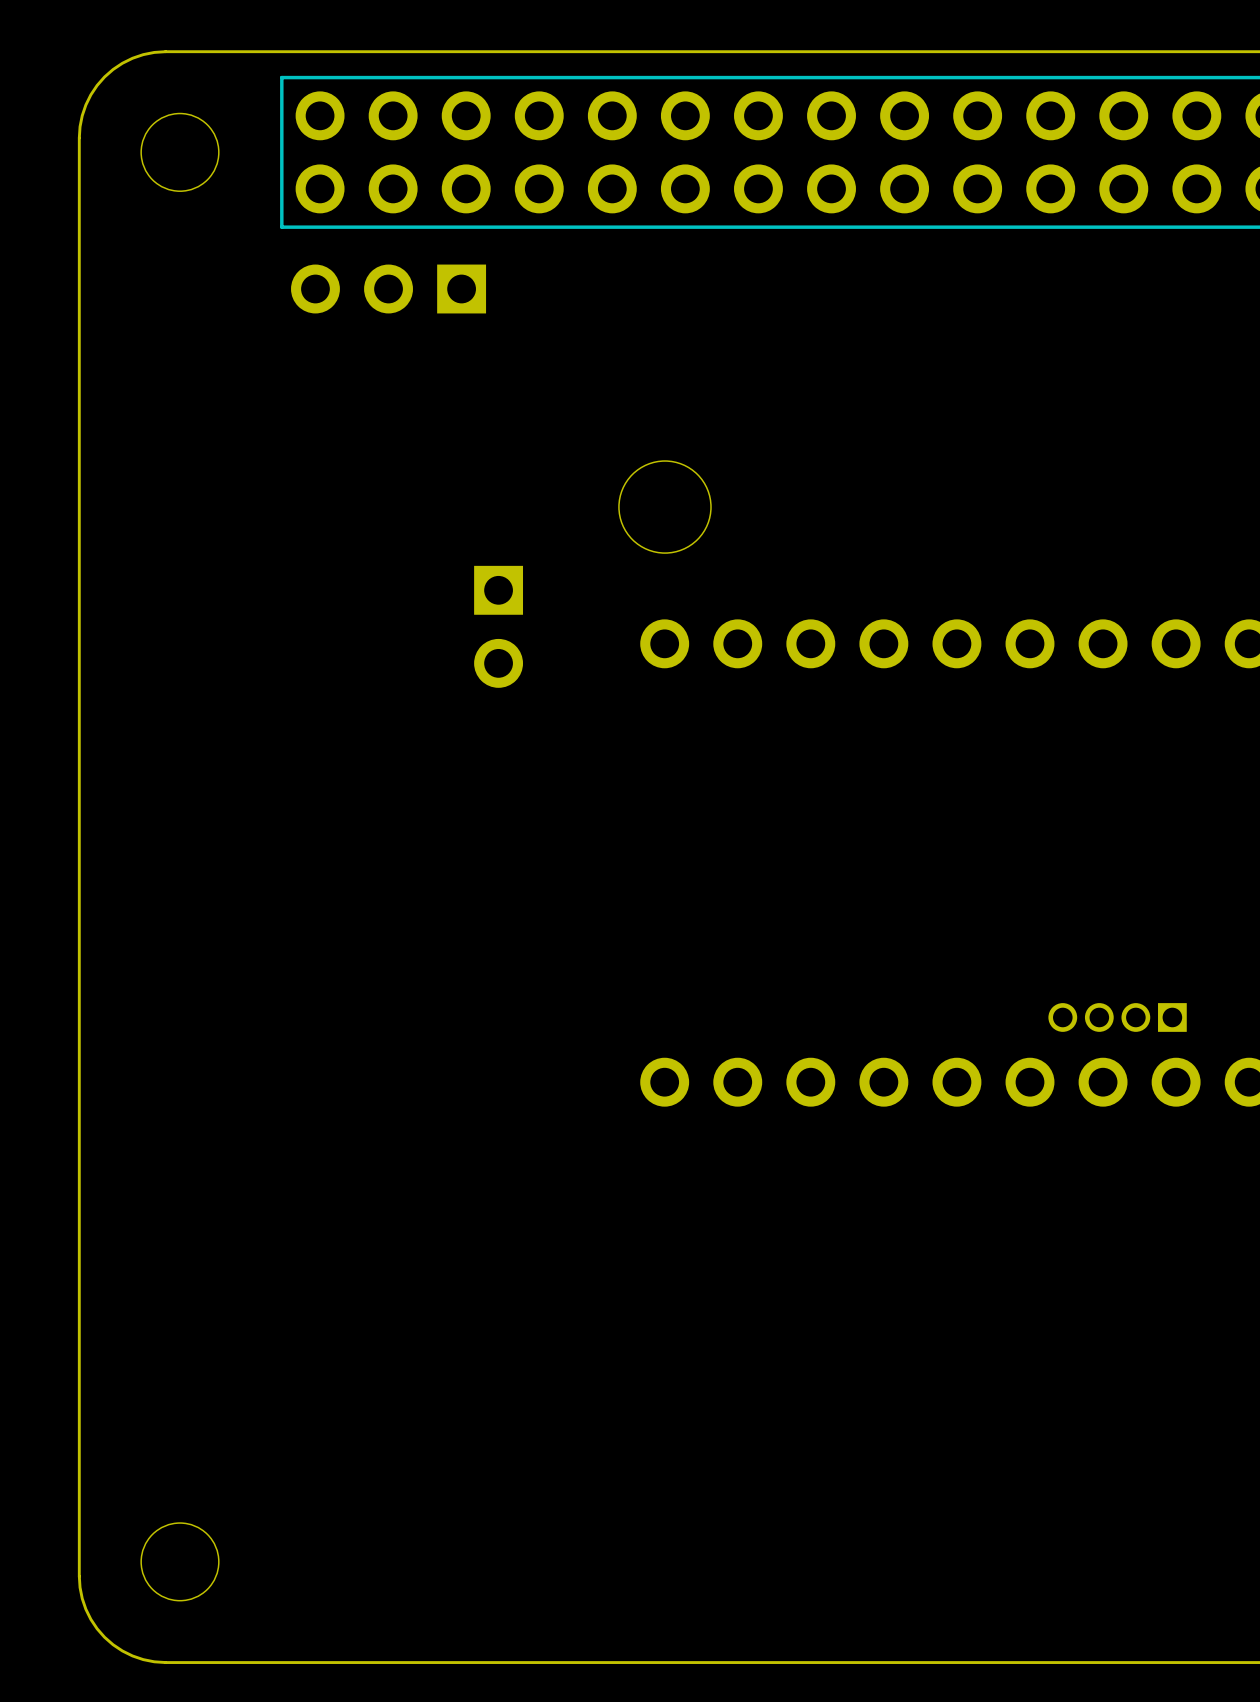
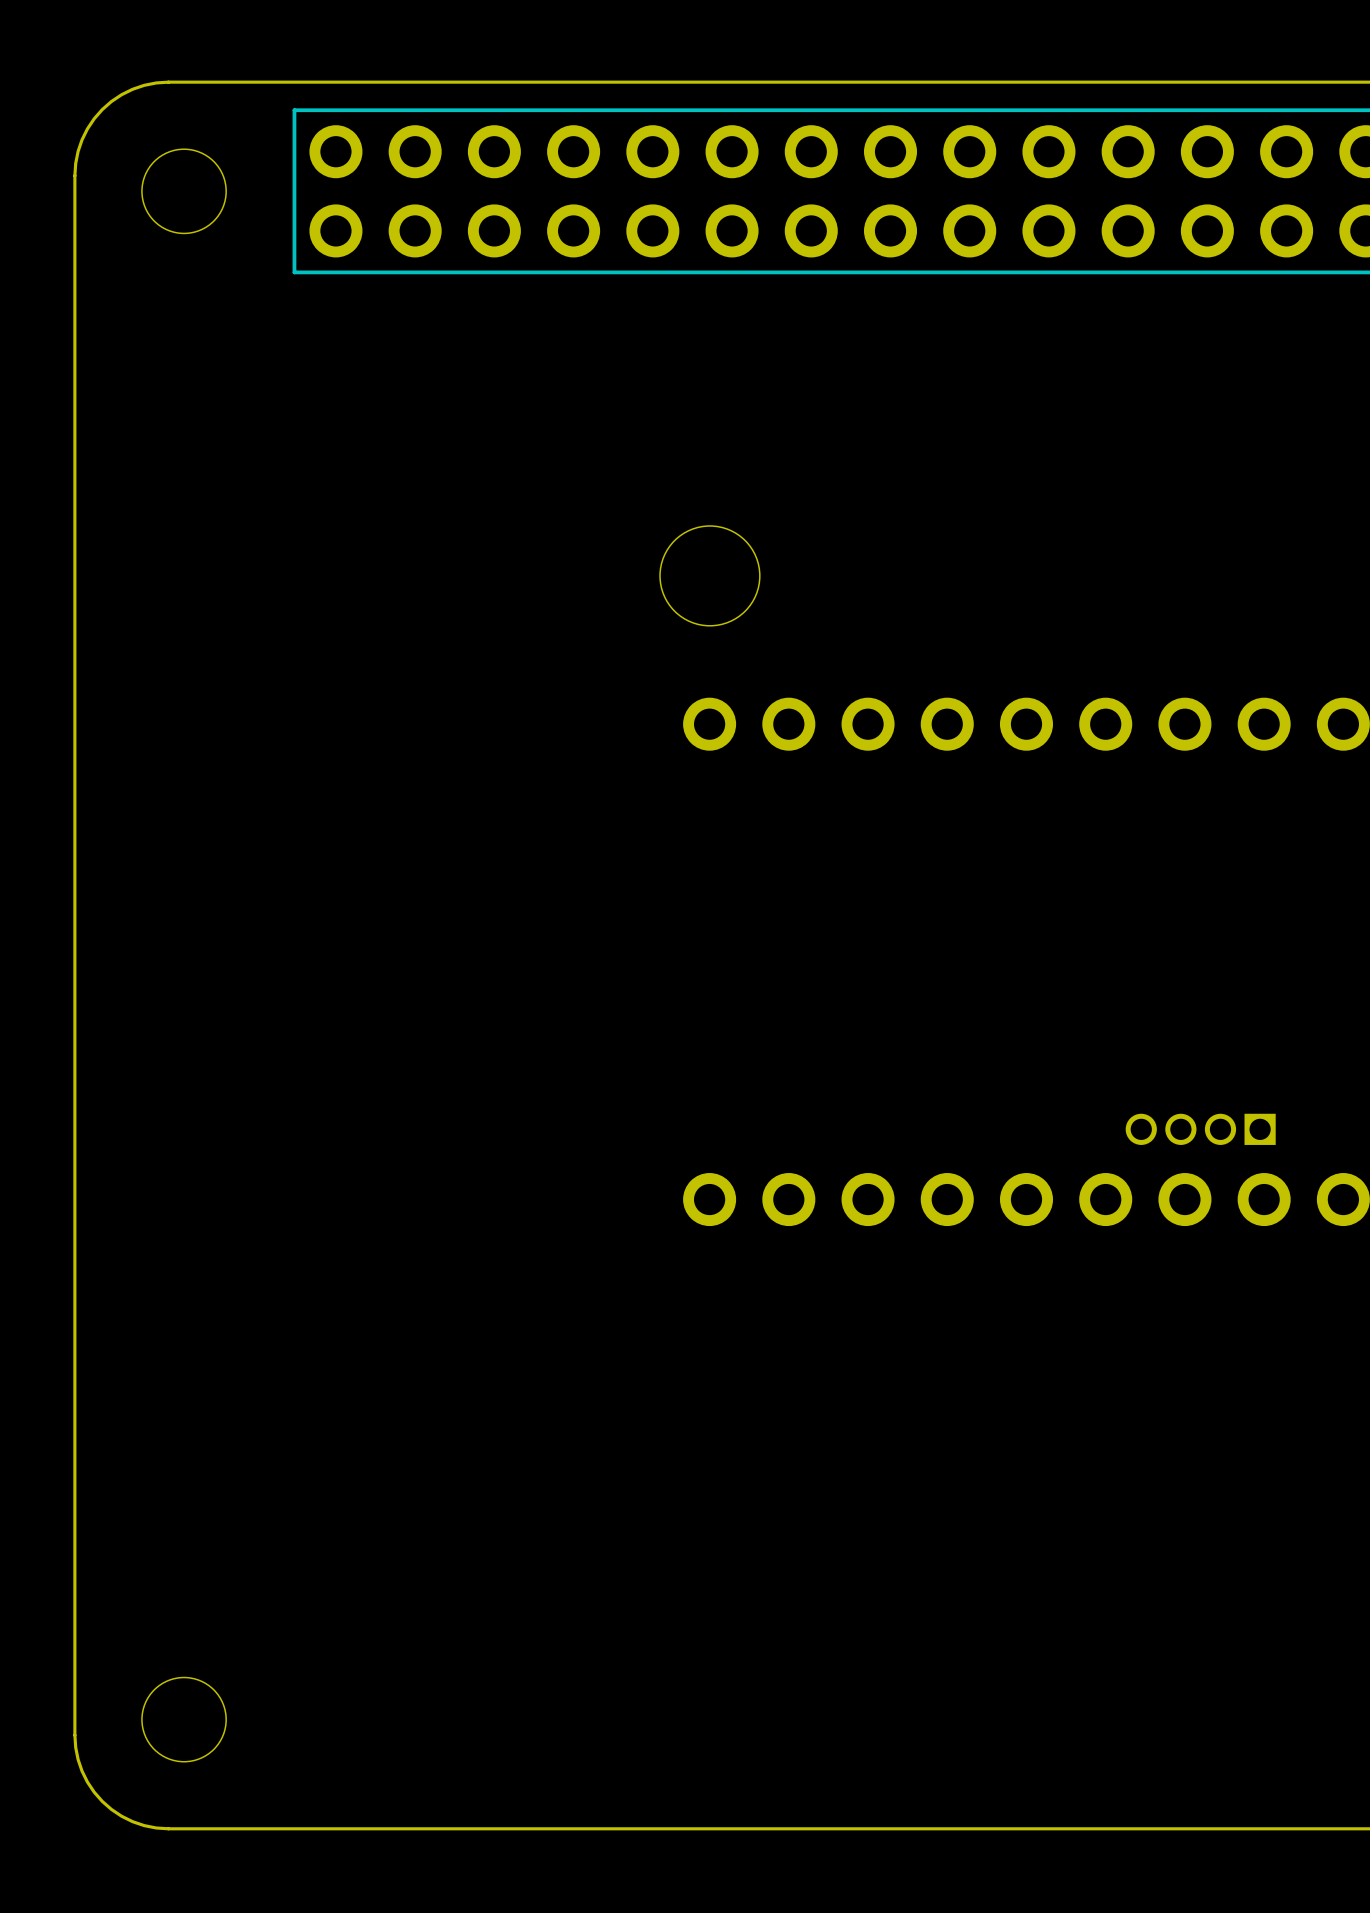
part: (388, 289) -> none
part: (498, 626) -> none

